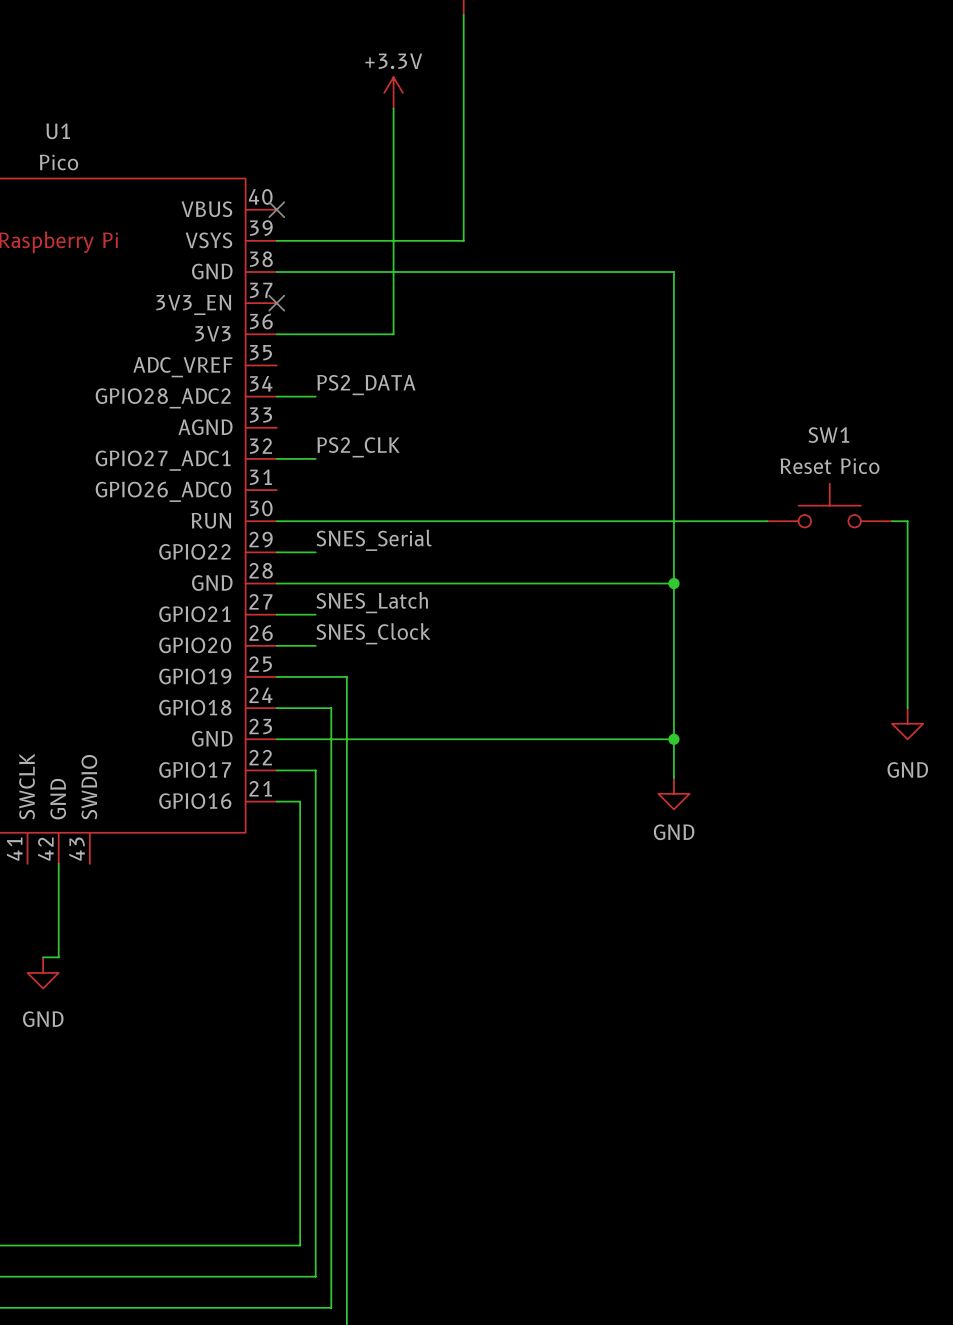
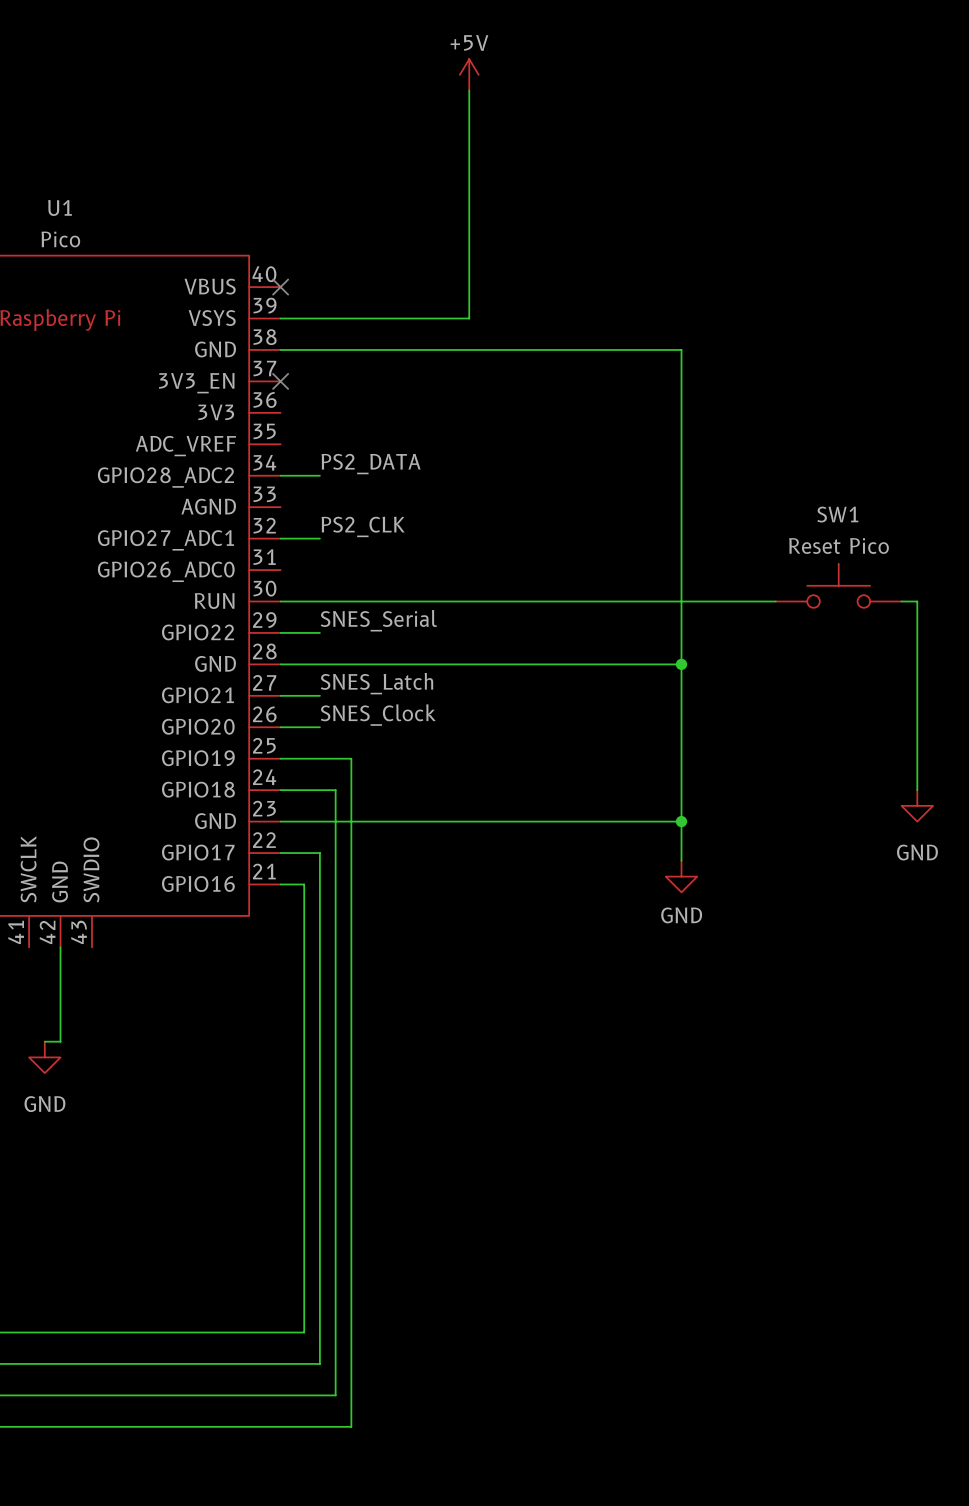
power symbol: +3.3V (393, 92) -> none
wire: (393, 108) (393, 334) (276, 334) -> none

